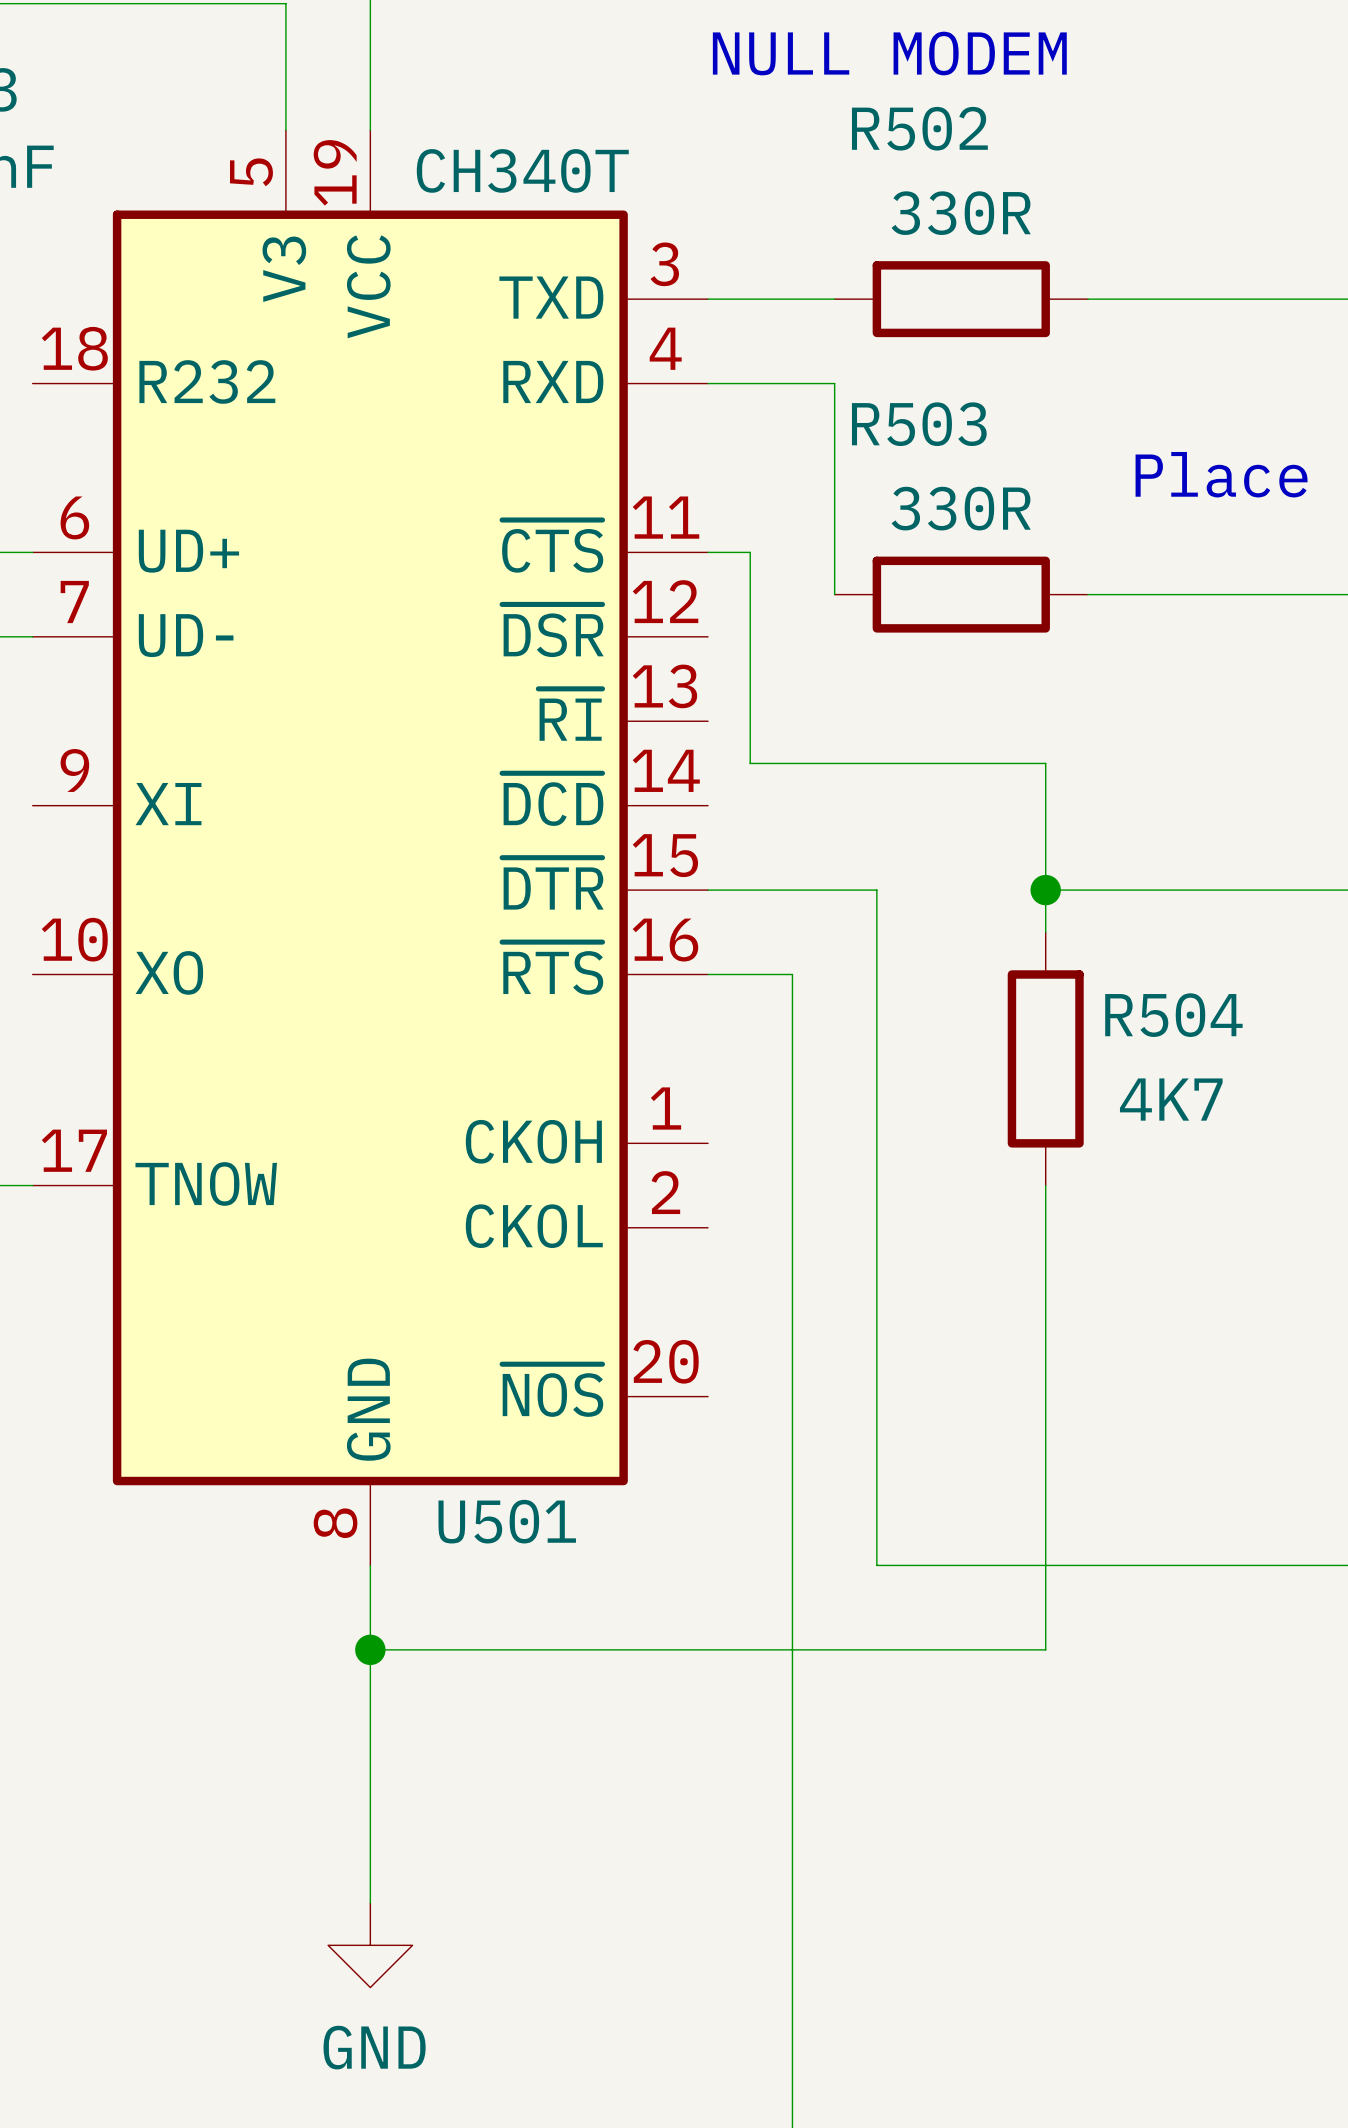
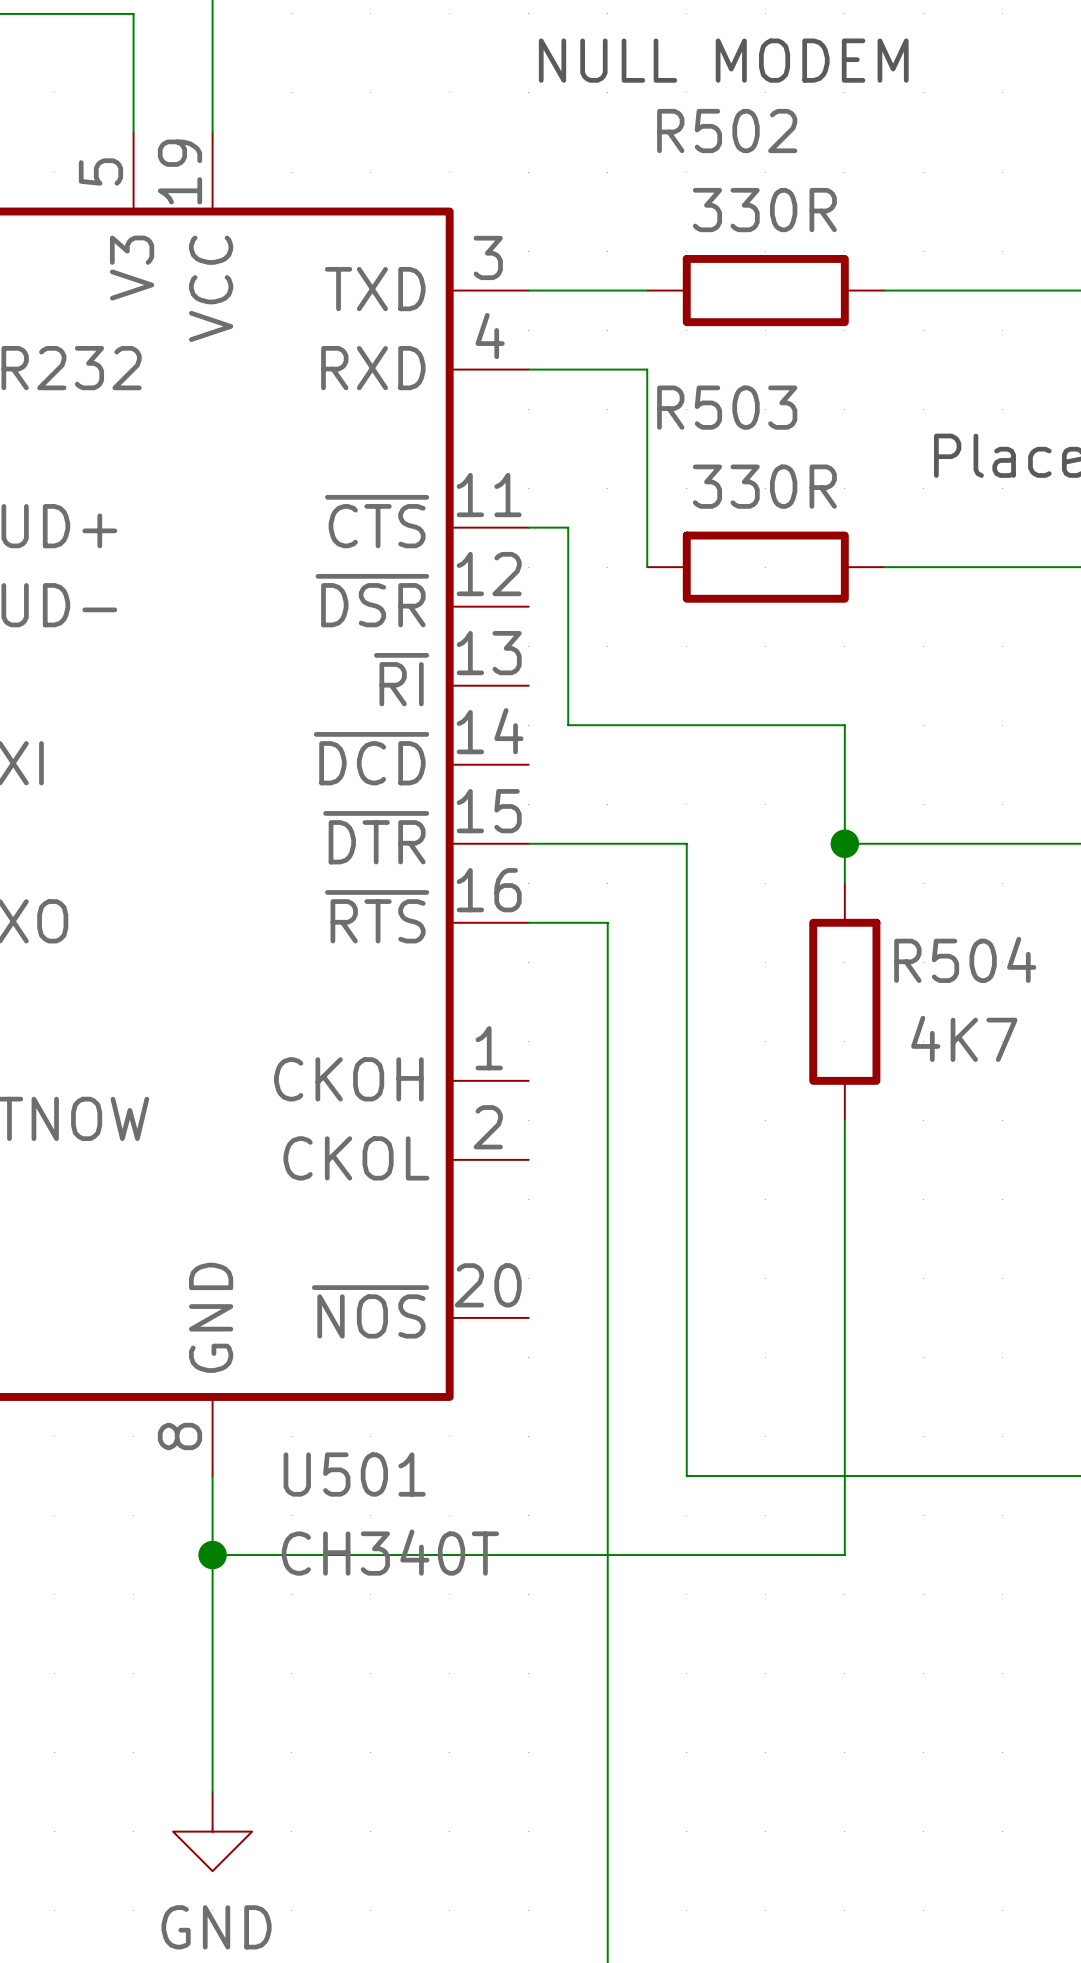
U501 value position: CH340T (522, 170) -> CH340T (390, 1552)
U501 name position: U501 (507, 1521) -> U501 (354, 1474)

